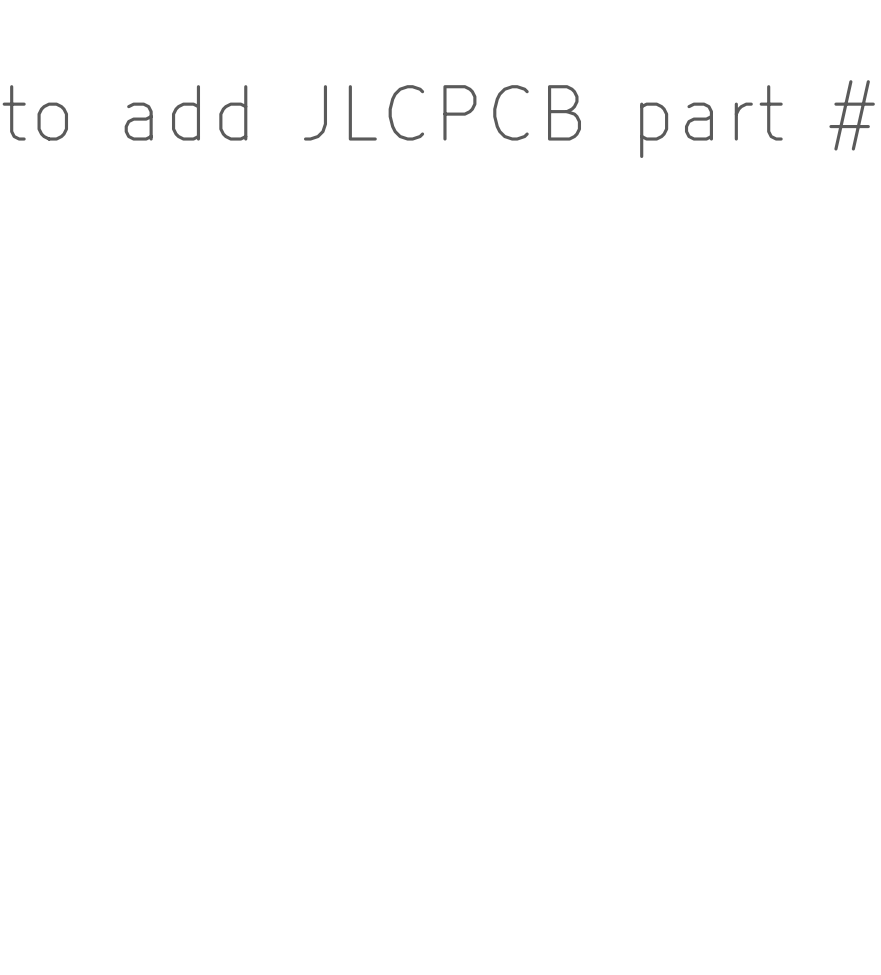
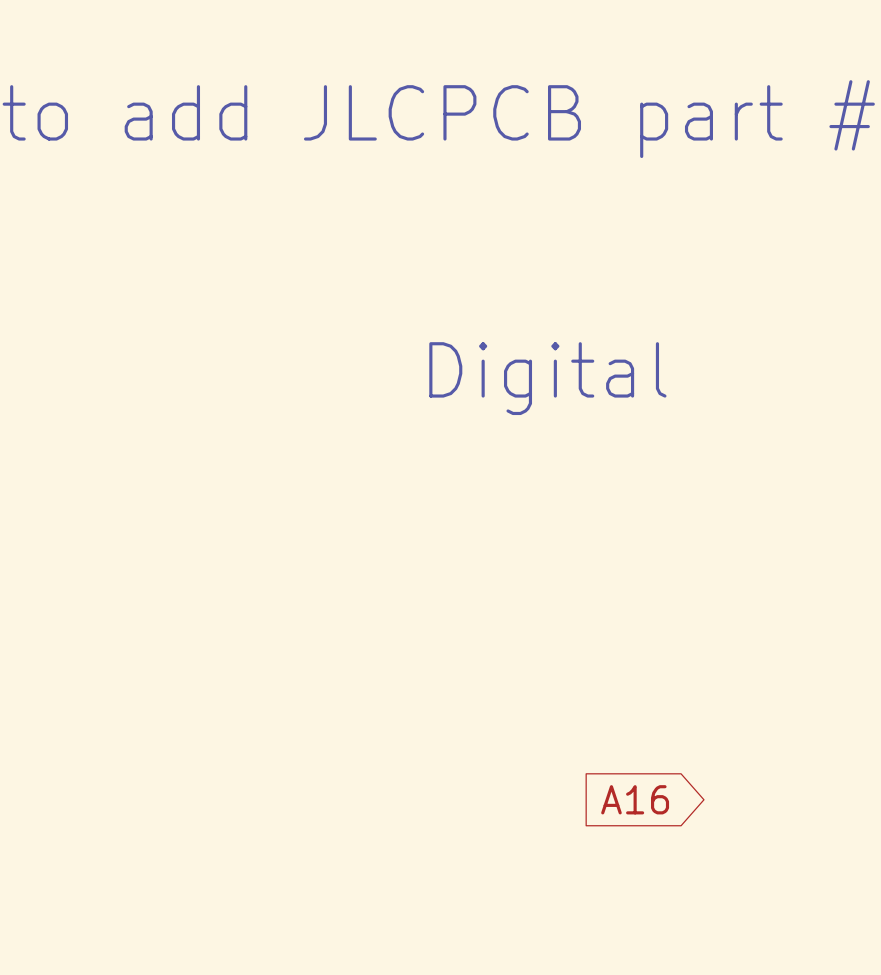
text: none -> Digital (547, 378)
global label: none -> A16 (635, 799)

